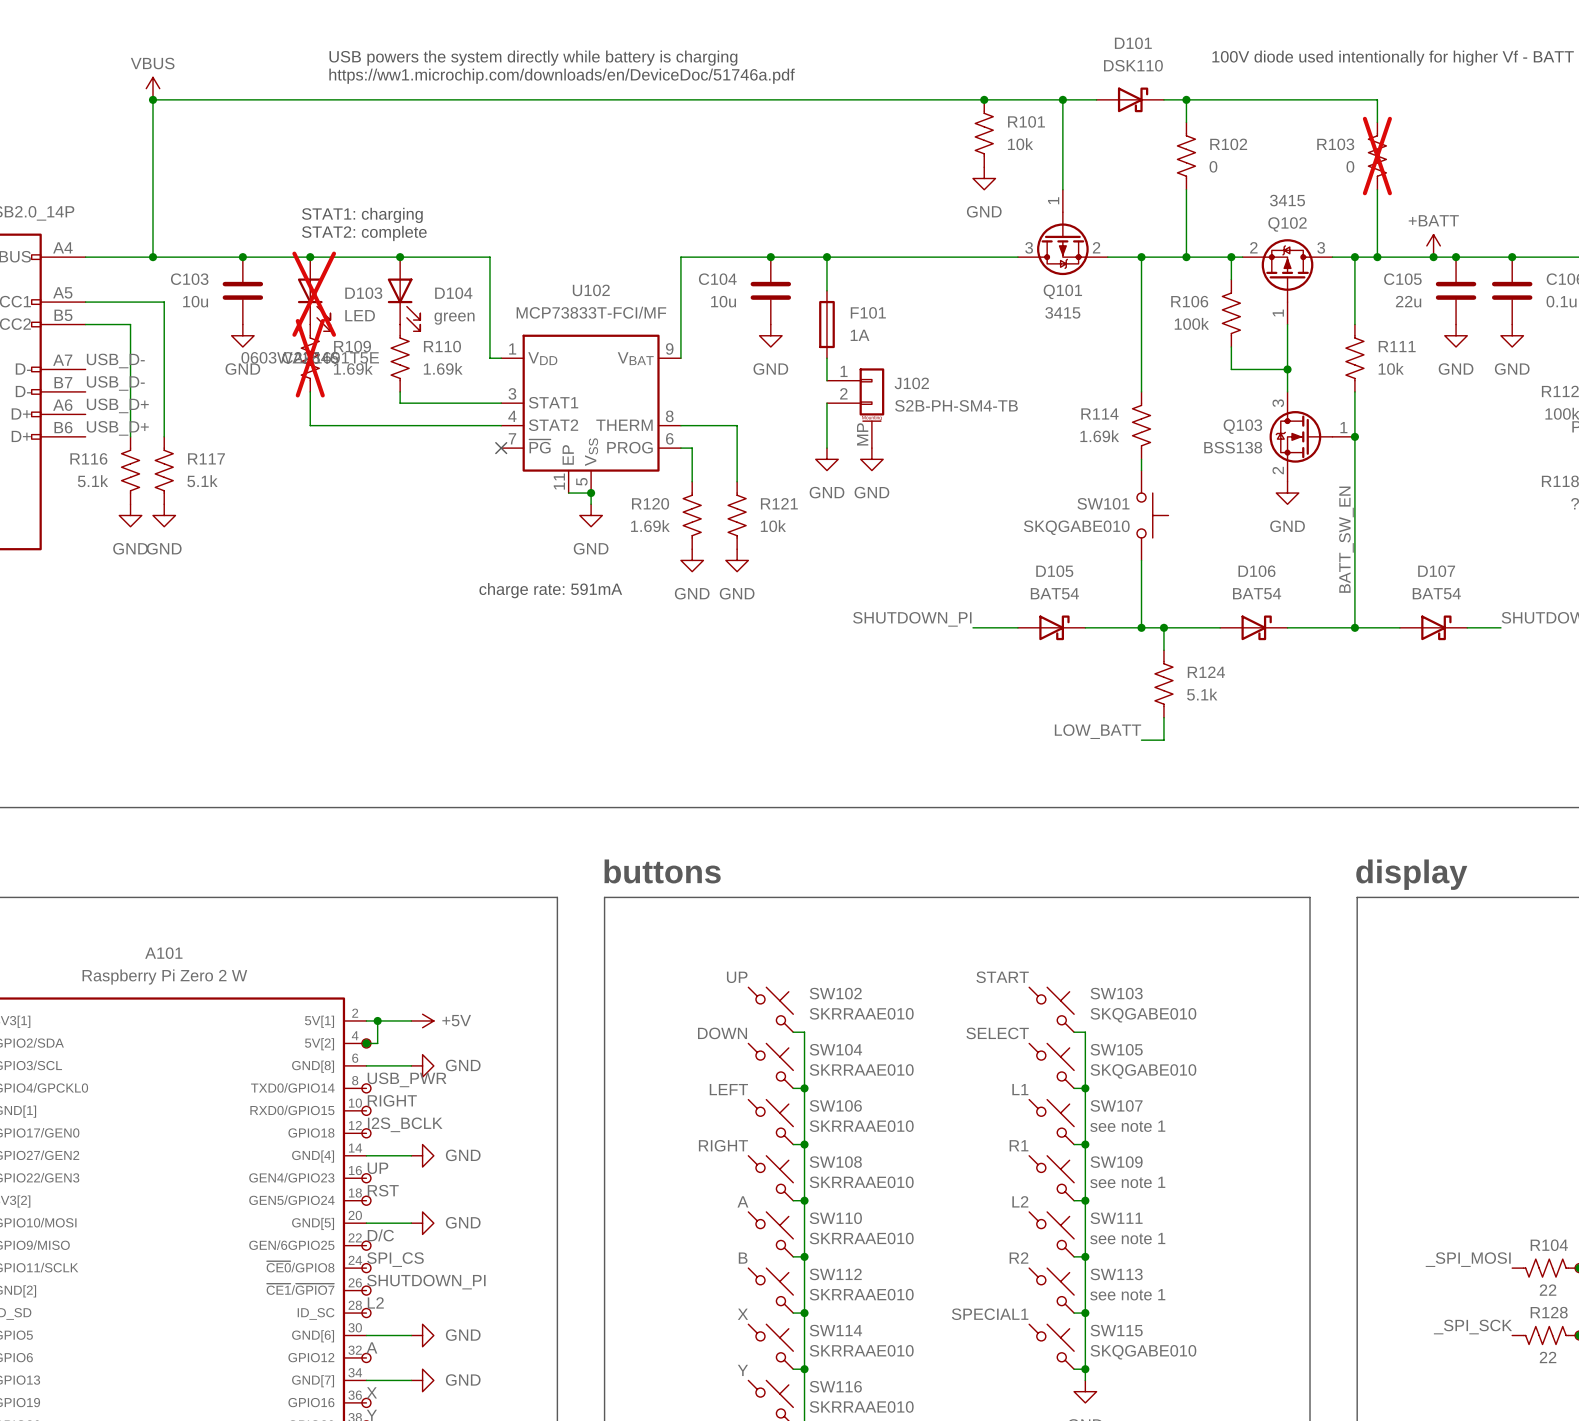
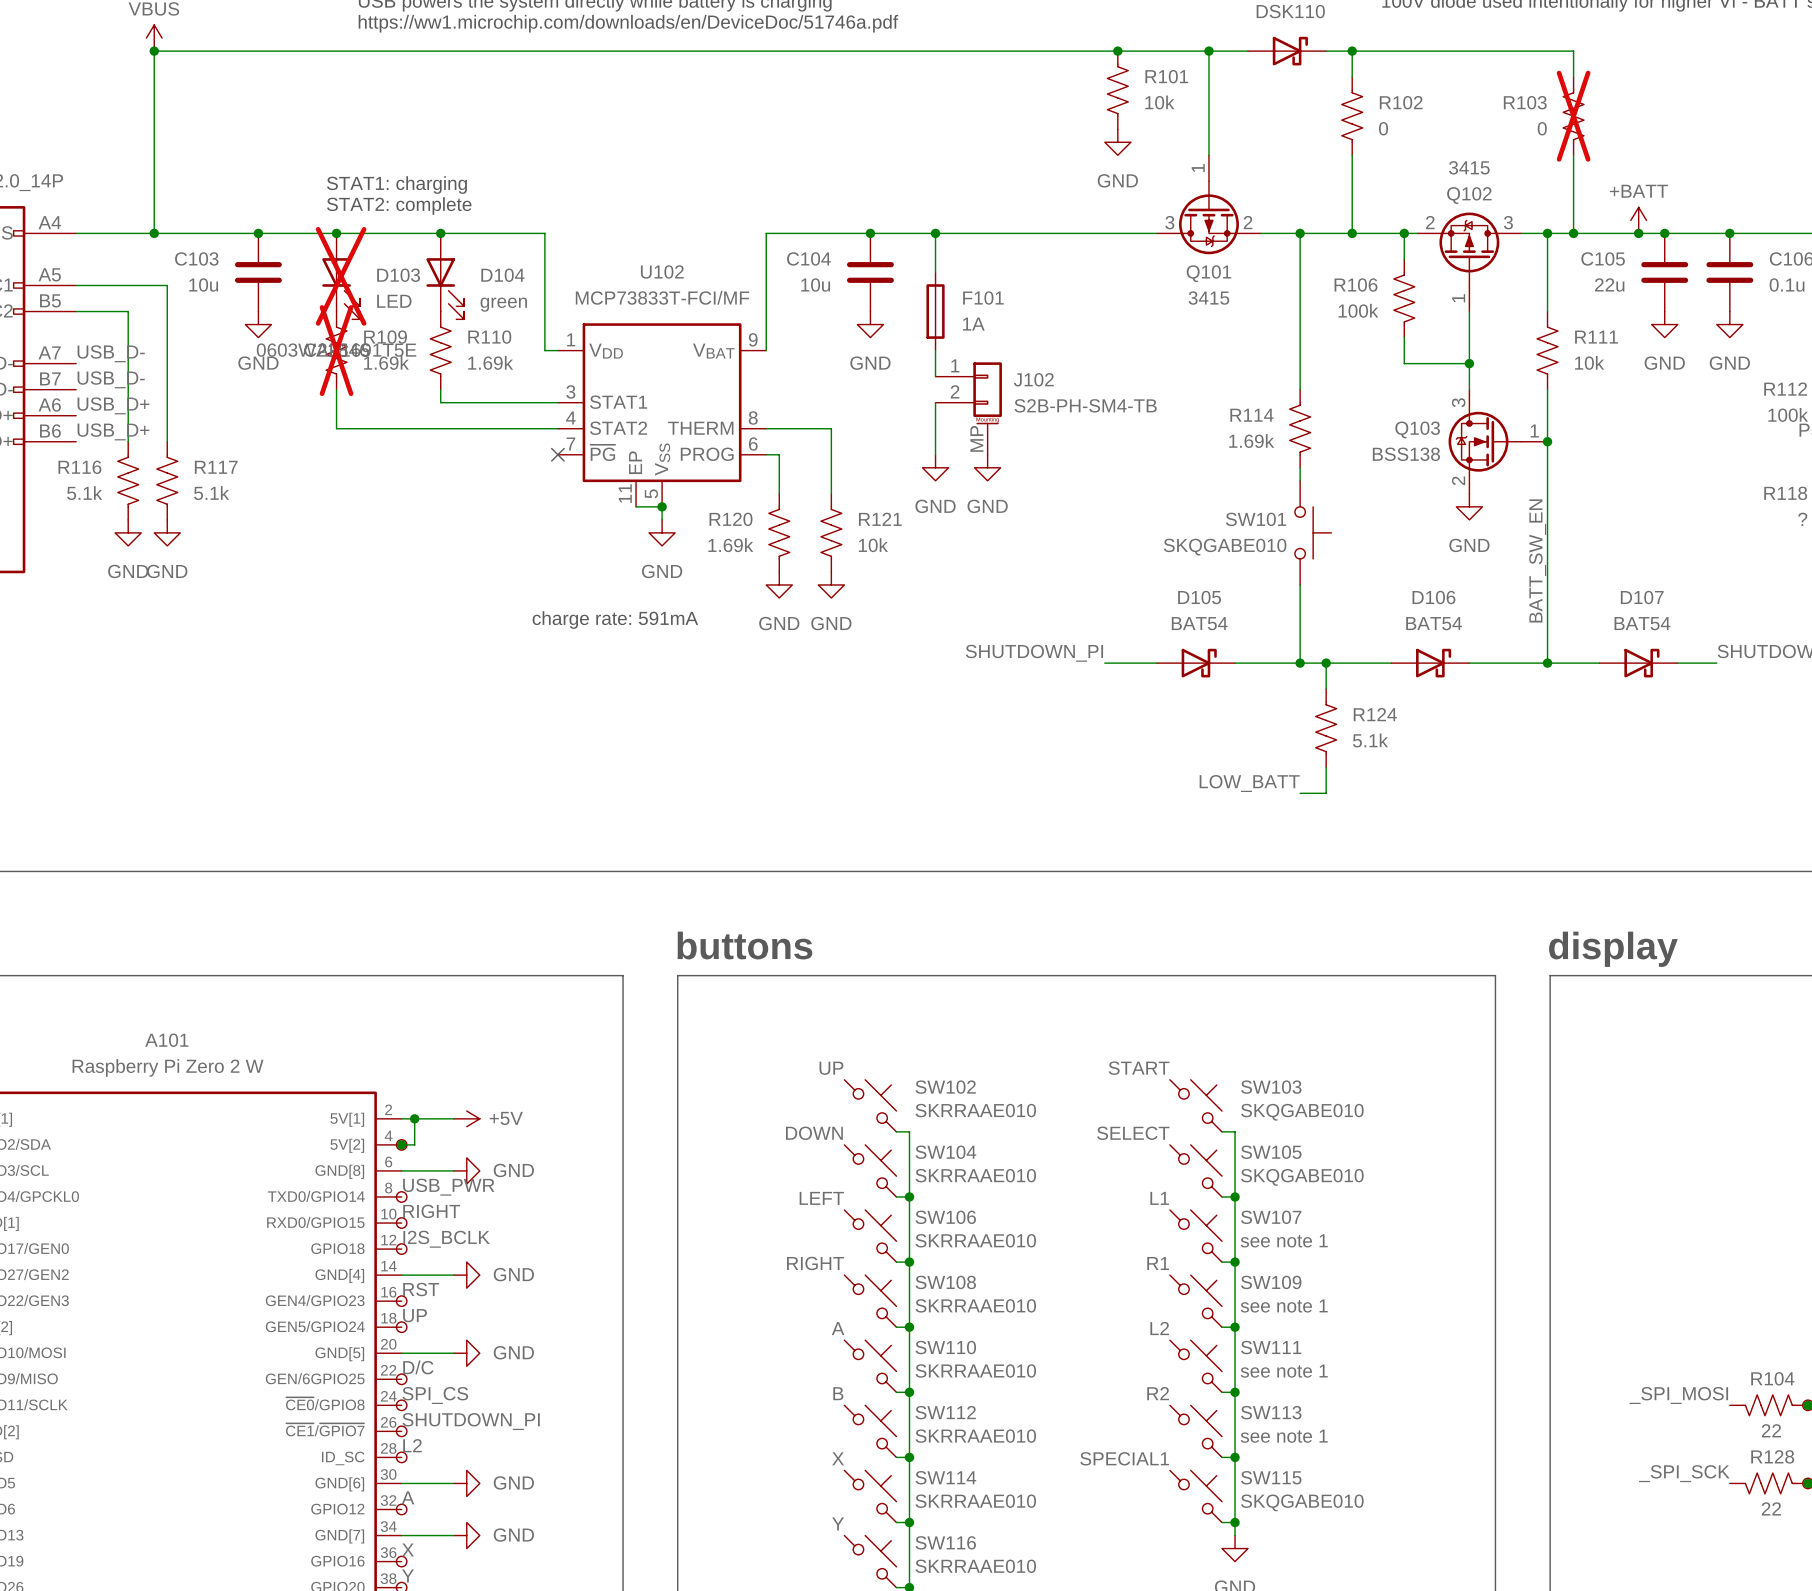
label: UP (377, 1168) -> RST (421, 1289)
label: RST (383, 1190) -> UP (415, 1315)

